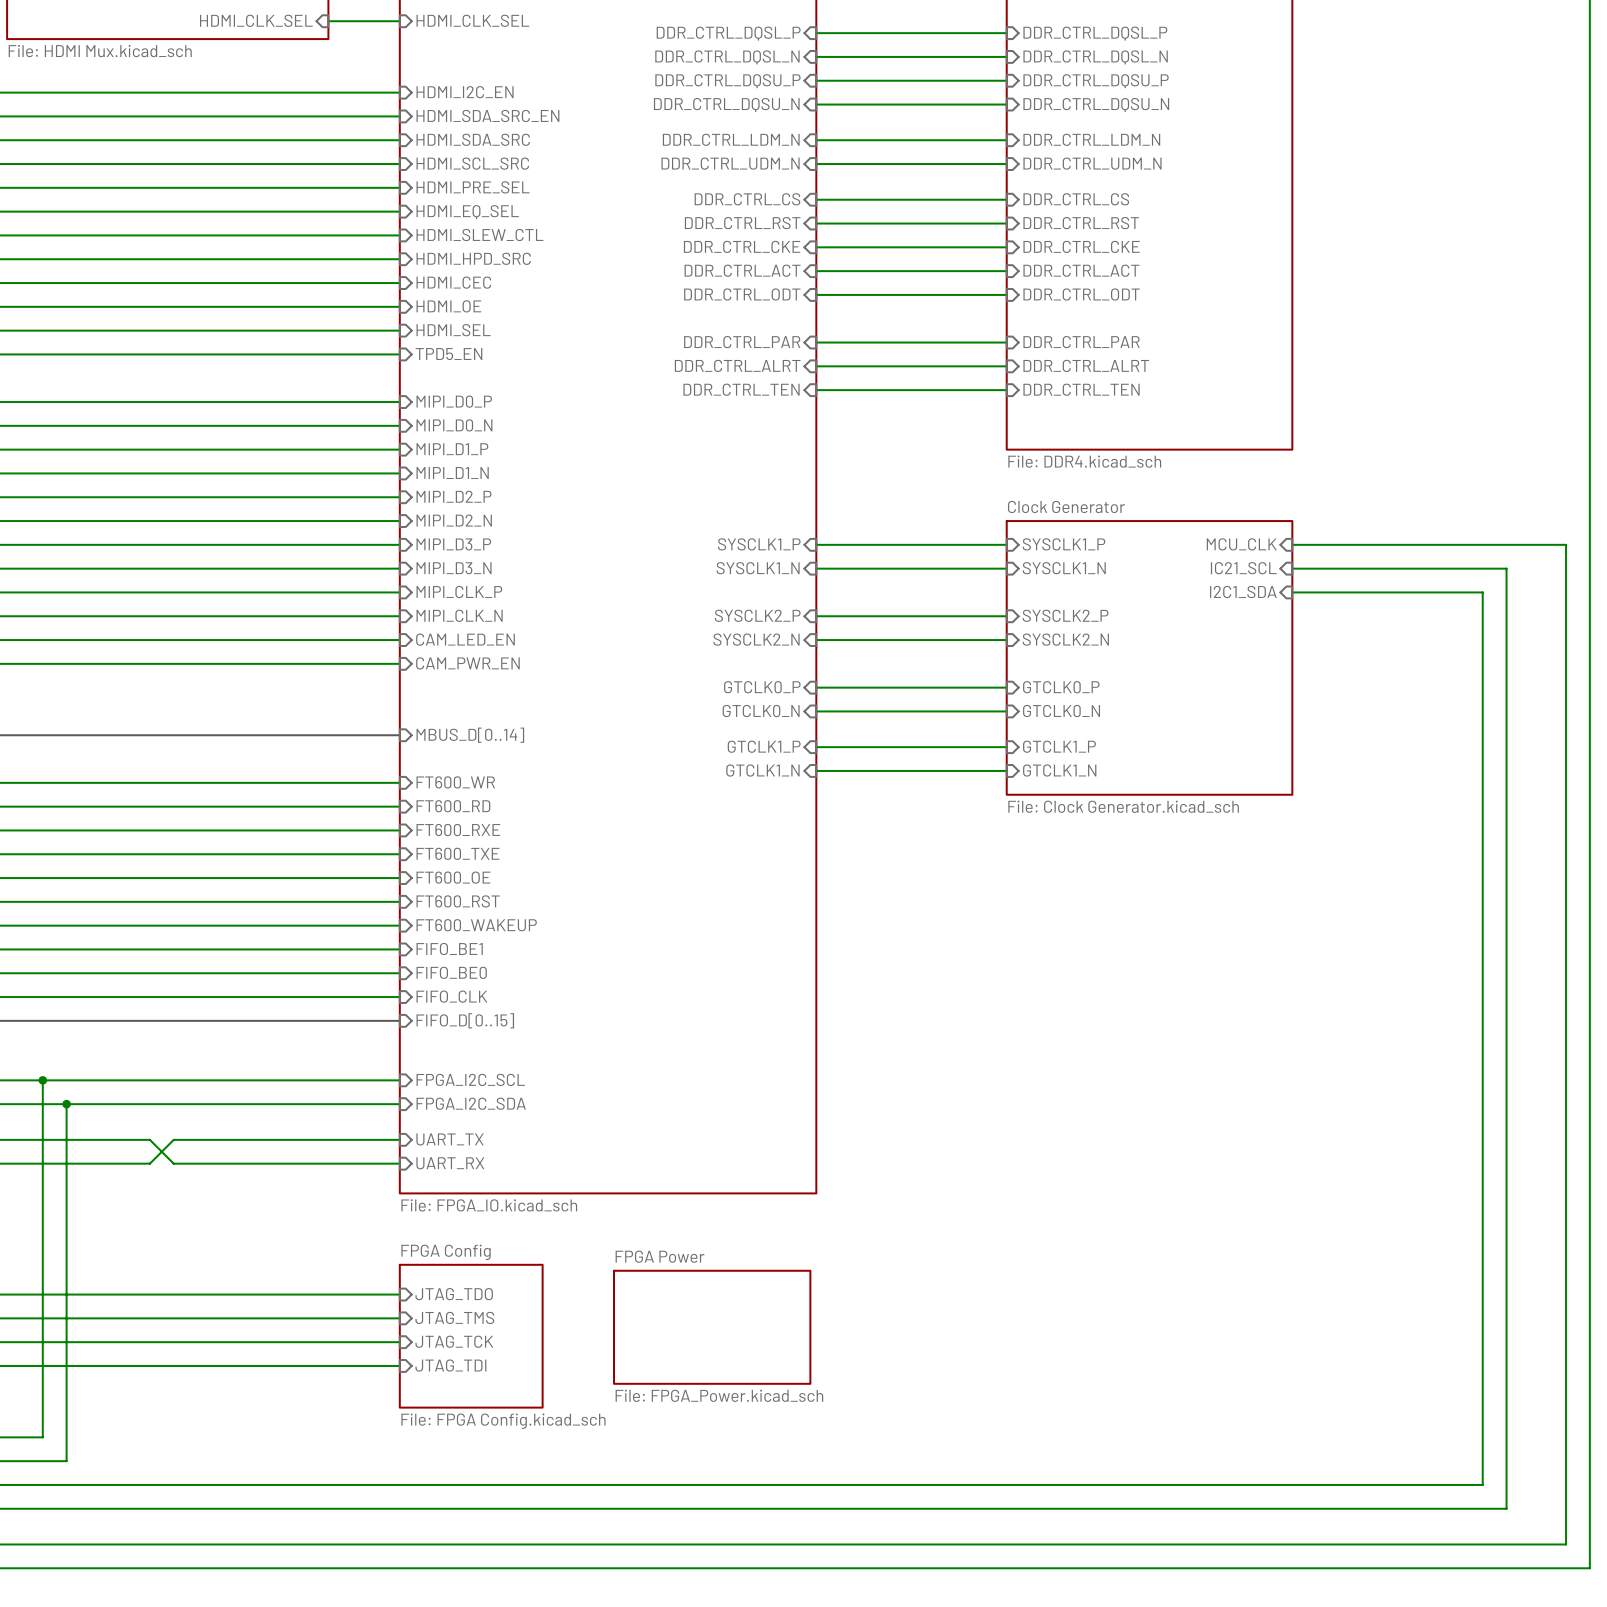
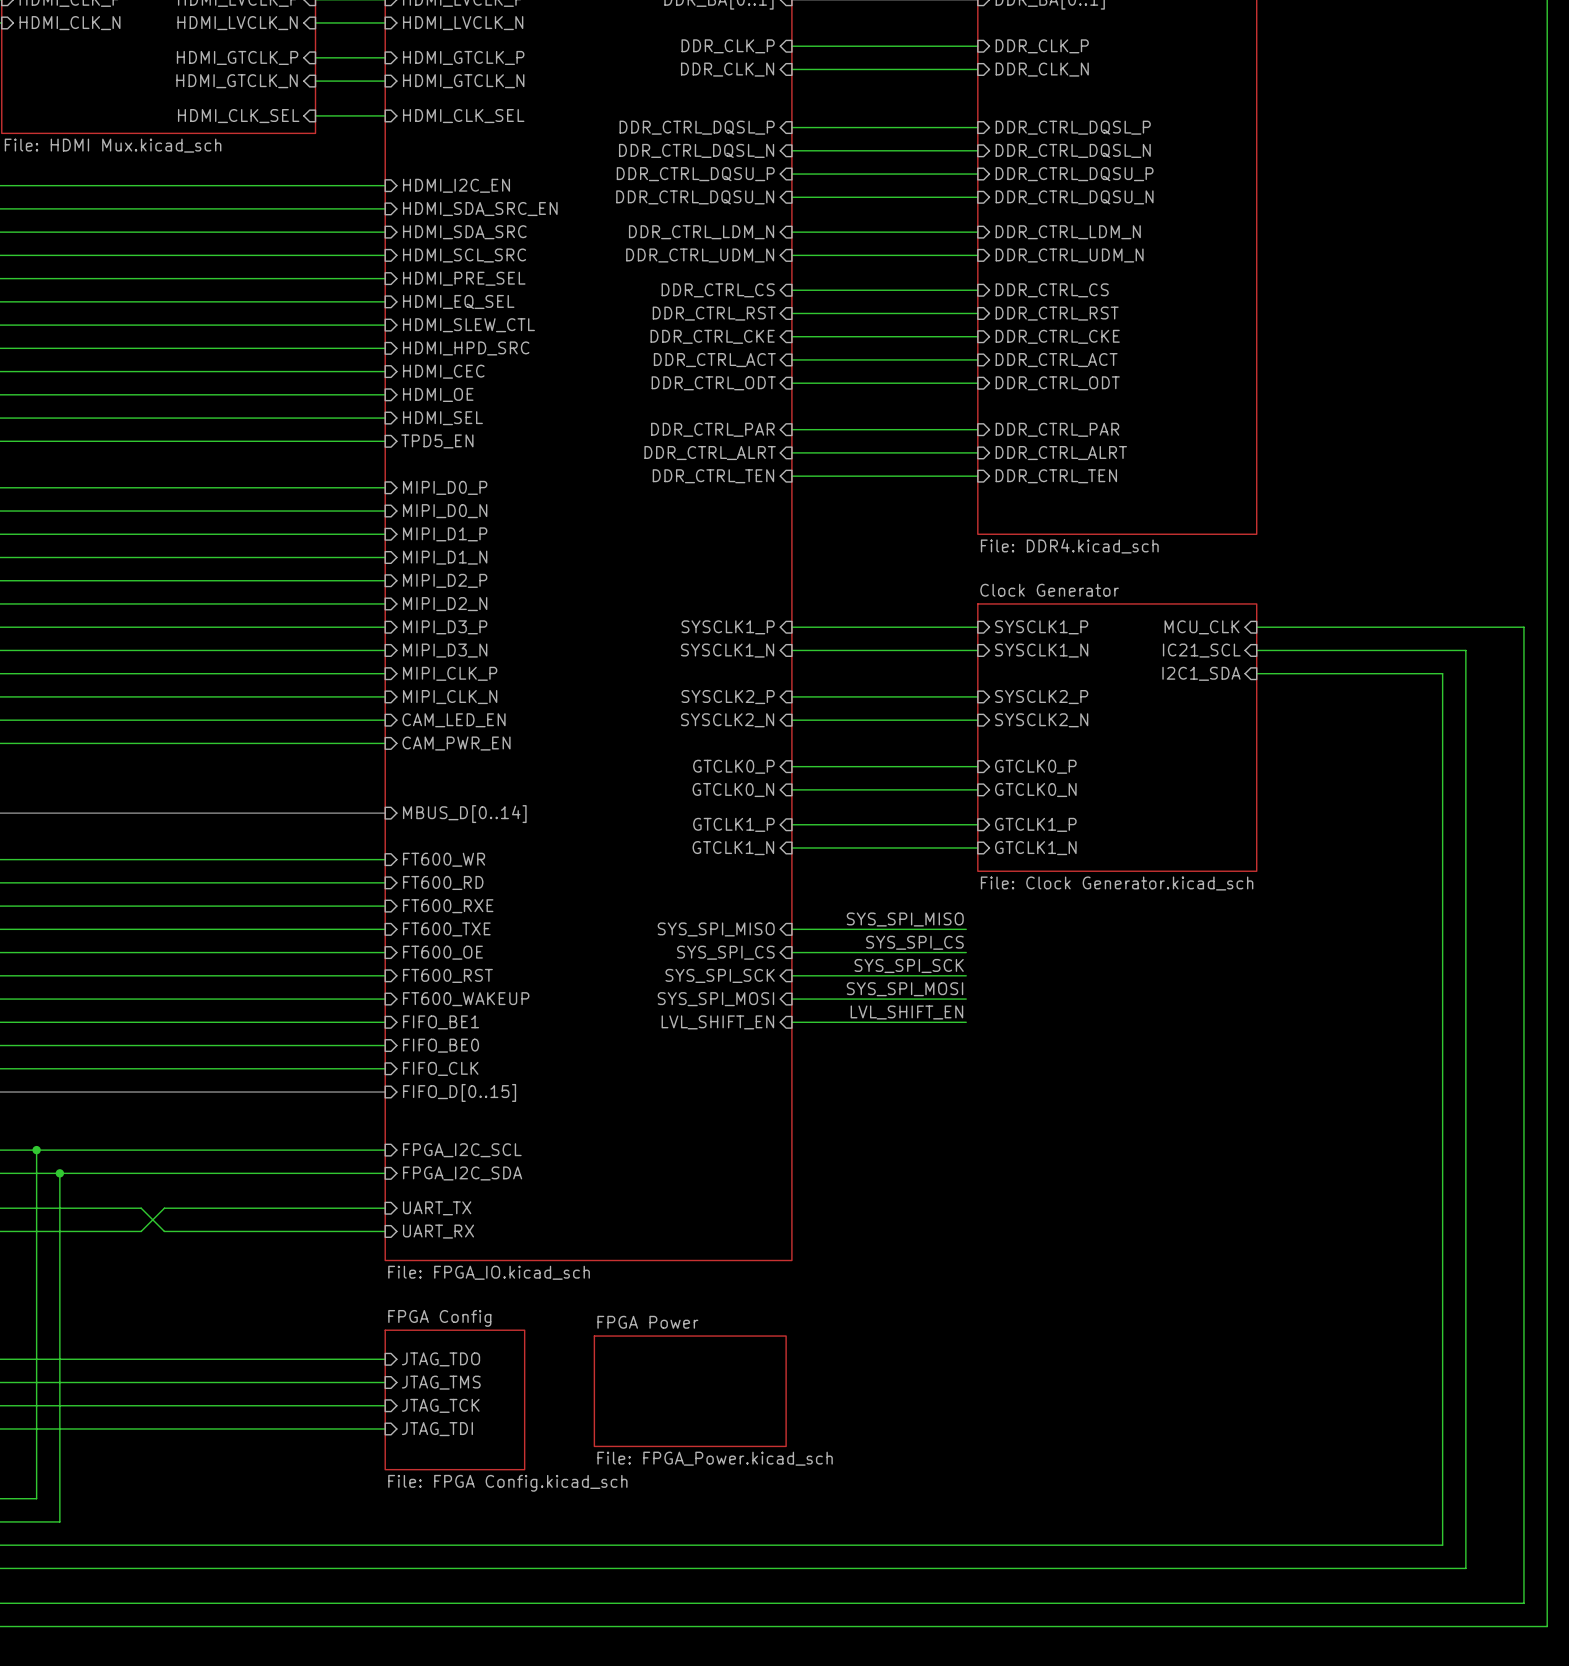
label: none -> SYS_SPI_MISO (905, 919)
sheet pin: none -> SYS_SPI_MISO (716, 929)
wire: none -> (791, 929) (966, 929)
label: none -> SYS_SPI_CS (914, 942)
sheet pin: none -> SYS_SPI_CS (725, 952)
wire: none -> (791, 952) (966, 952)
label: none -> SYS_SPI_SCK (909, 965)
sheet pin: none -> SYS_SPI_SCK (720, 975)
wire: none -> (791, 975) (966, 975)
label: none -> SYS_SPI_MOSI (904, 989)
sheet pin: none -> SYS_SPI_MOSI (715, 999)
wire: none -> (791, 999) (966, 999)
label: none -> LVL_SHIFT_EN (906, 1012)
sheet pin: none -> LVL_SHIFT_EN (717, 1022)
wire: none -> (791, 1022) (966, 1022)

